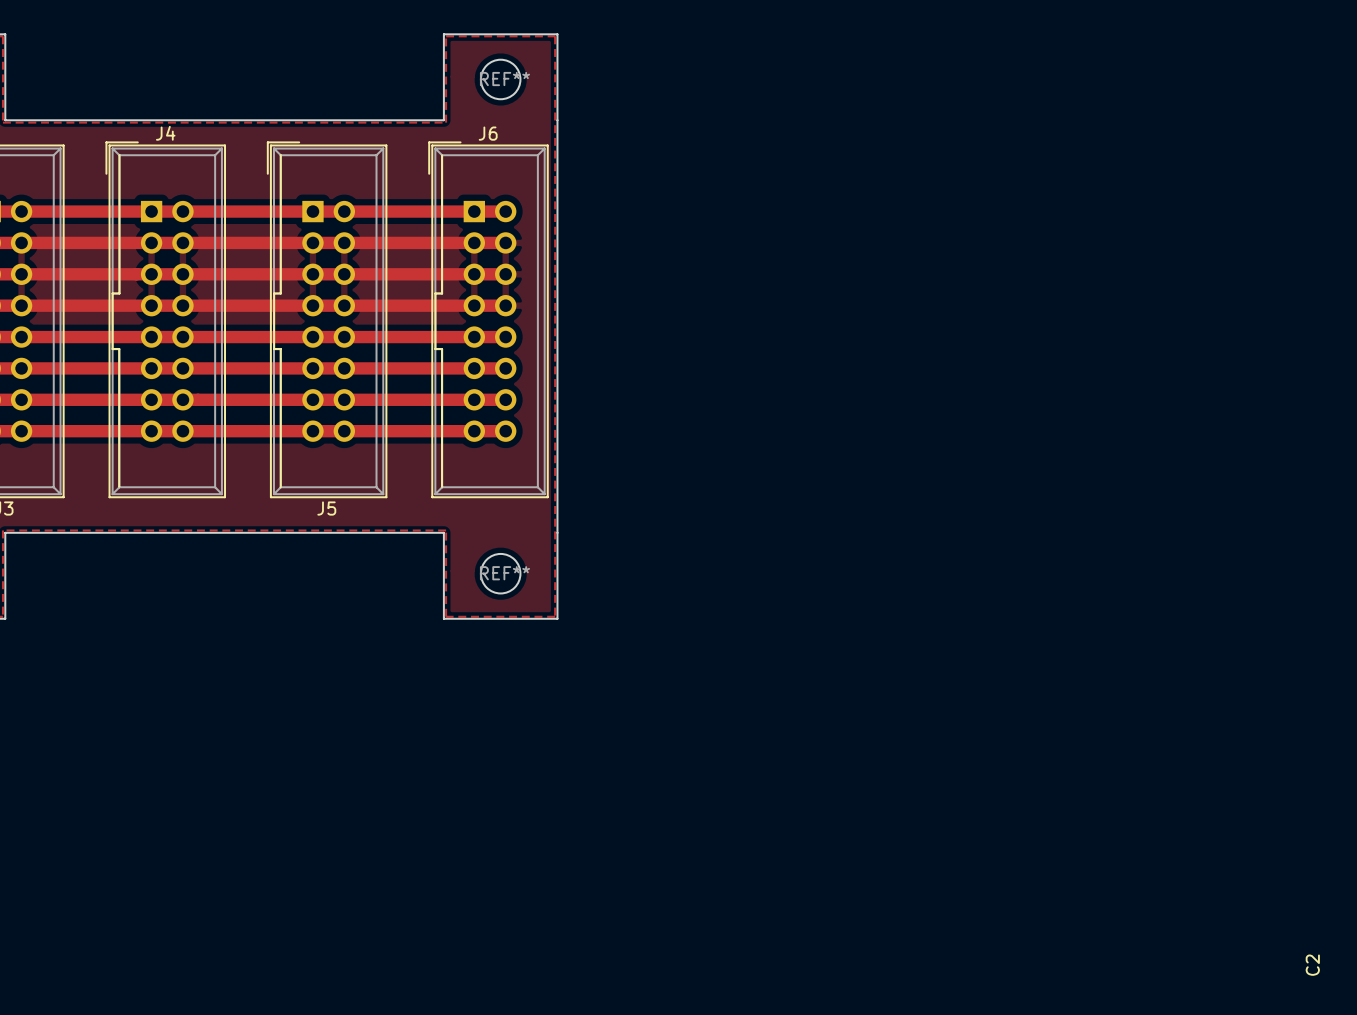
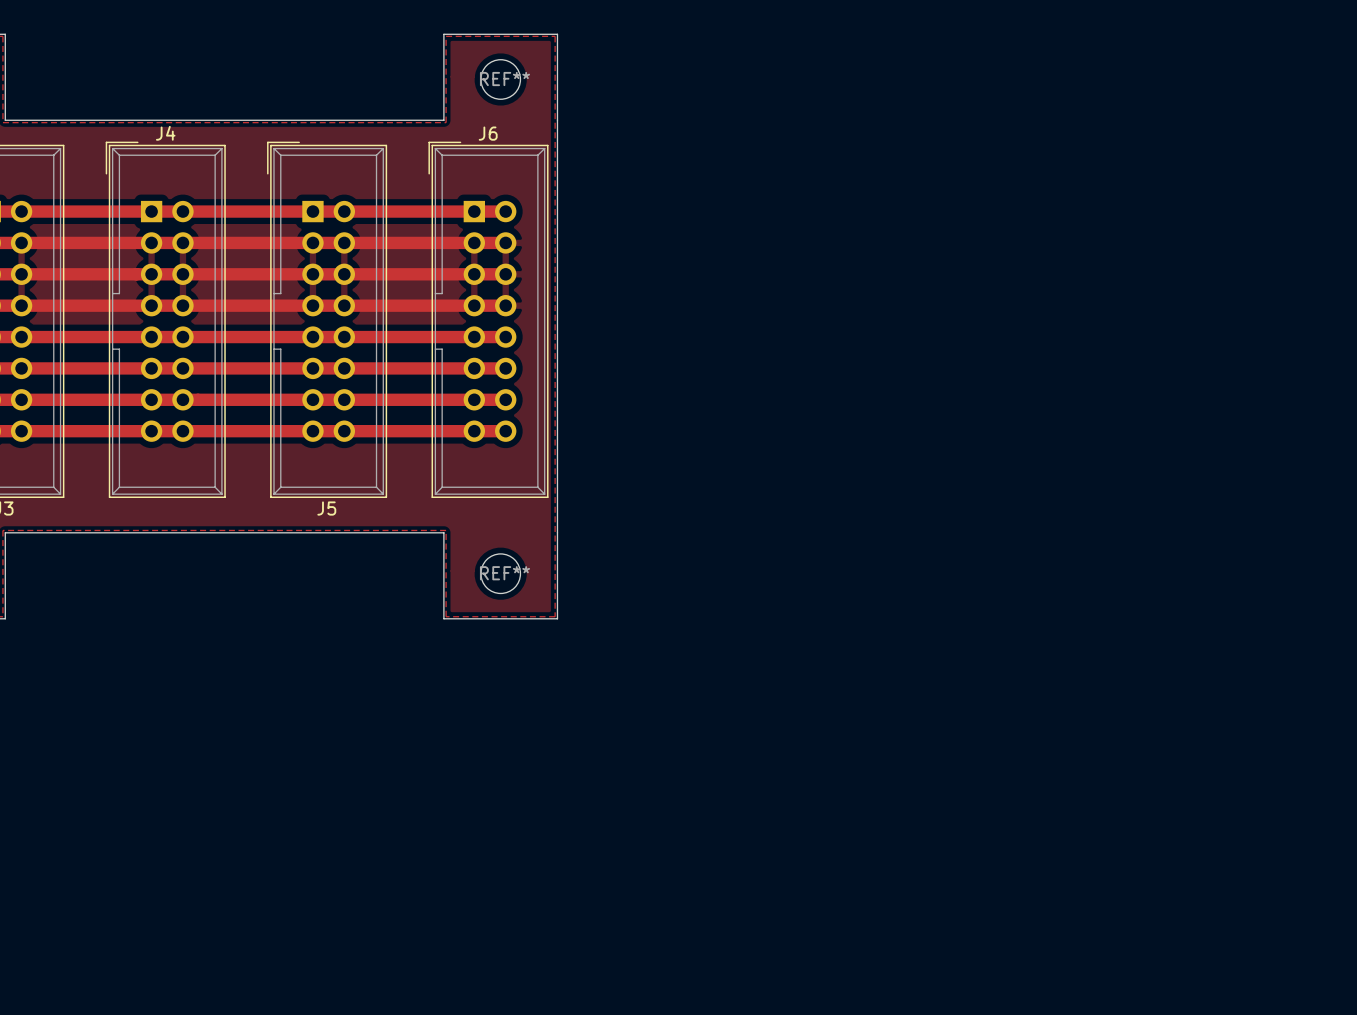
line: (119, 155) (119, 293) (112, 293) (112, 348) (119, 348) (119, 486) -> none
line: (280, 155) (280, 293) (274, 293) (274, 348) (280, 348) (280, 487) -> none
line: (442, 155) (442, 293) (435, 293) (435, 348) (442, 348) (442, 487) -> none
drawing: [1305, 954, 1320, 976] -> none

